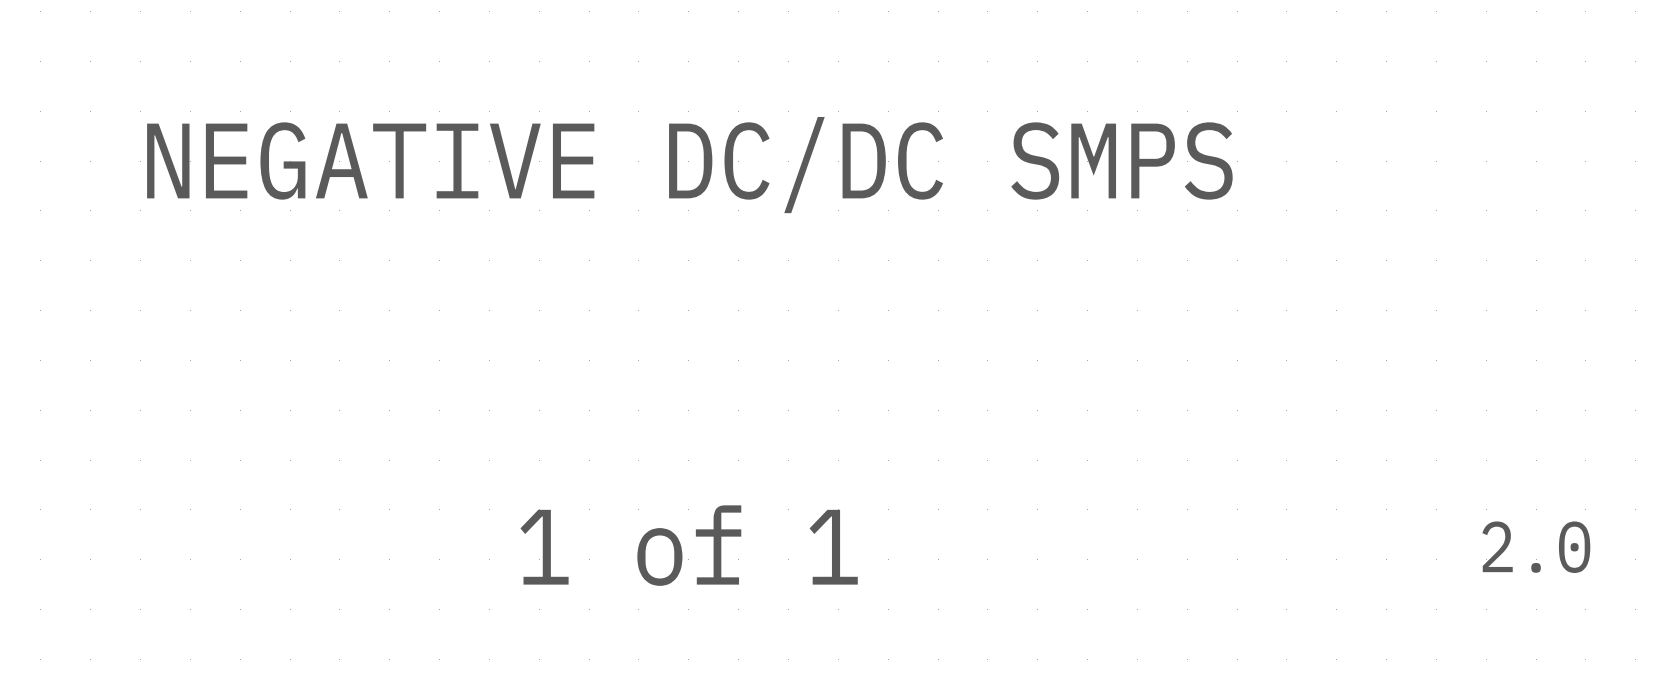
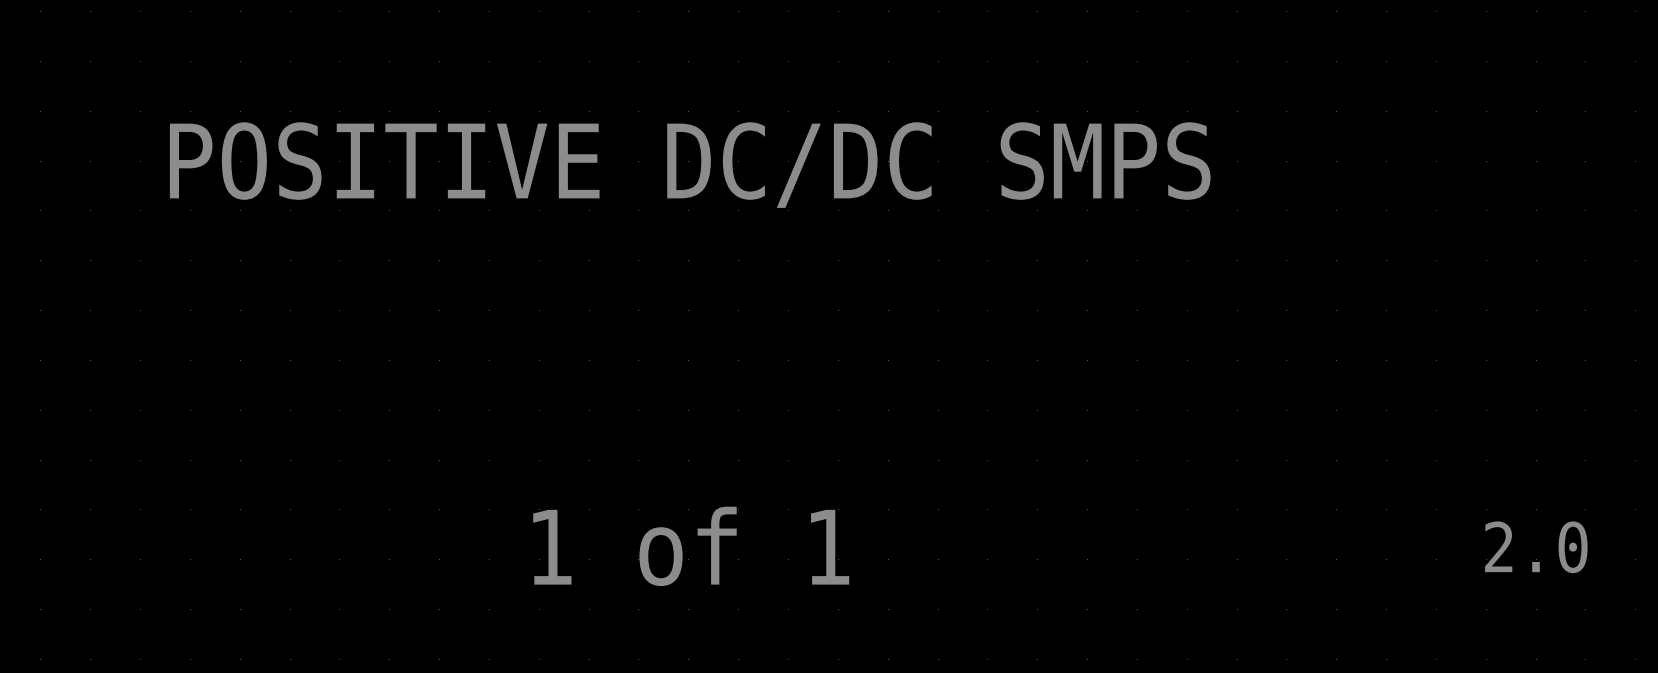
text: NEGATIVE DC/DC SMPS (689, 165) -> POSITIVE DC/DC SMPS (690, 165)

